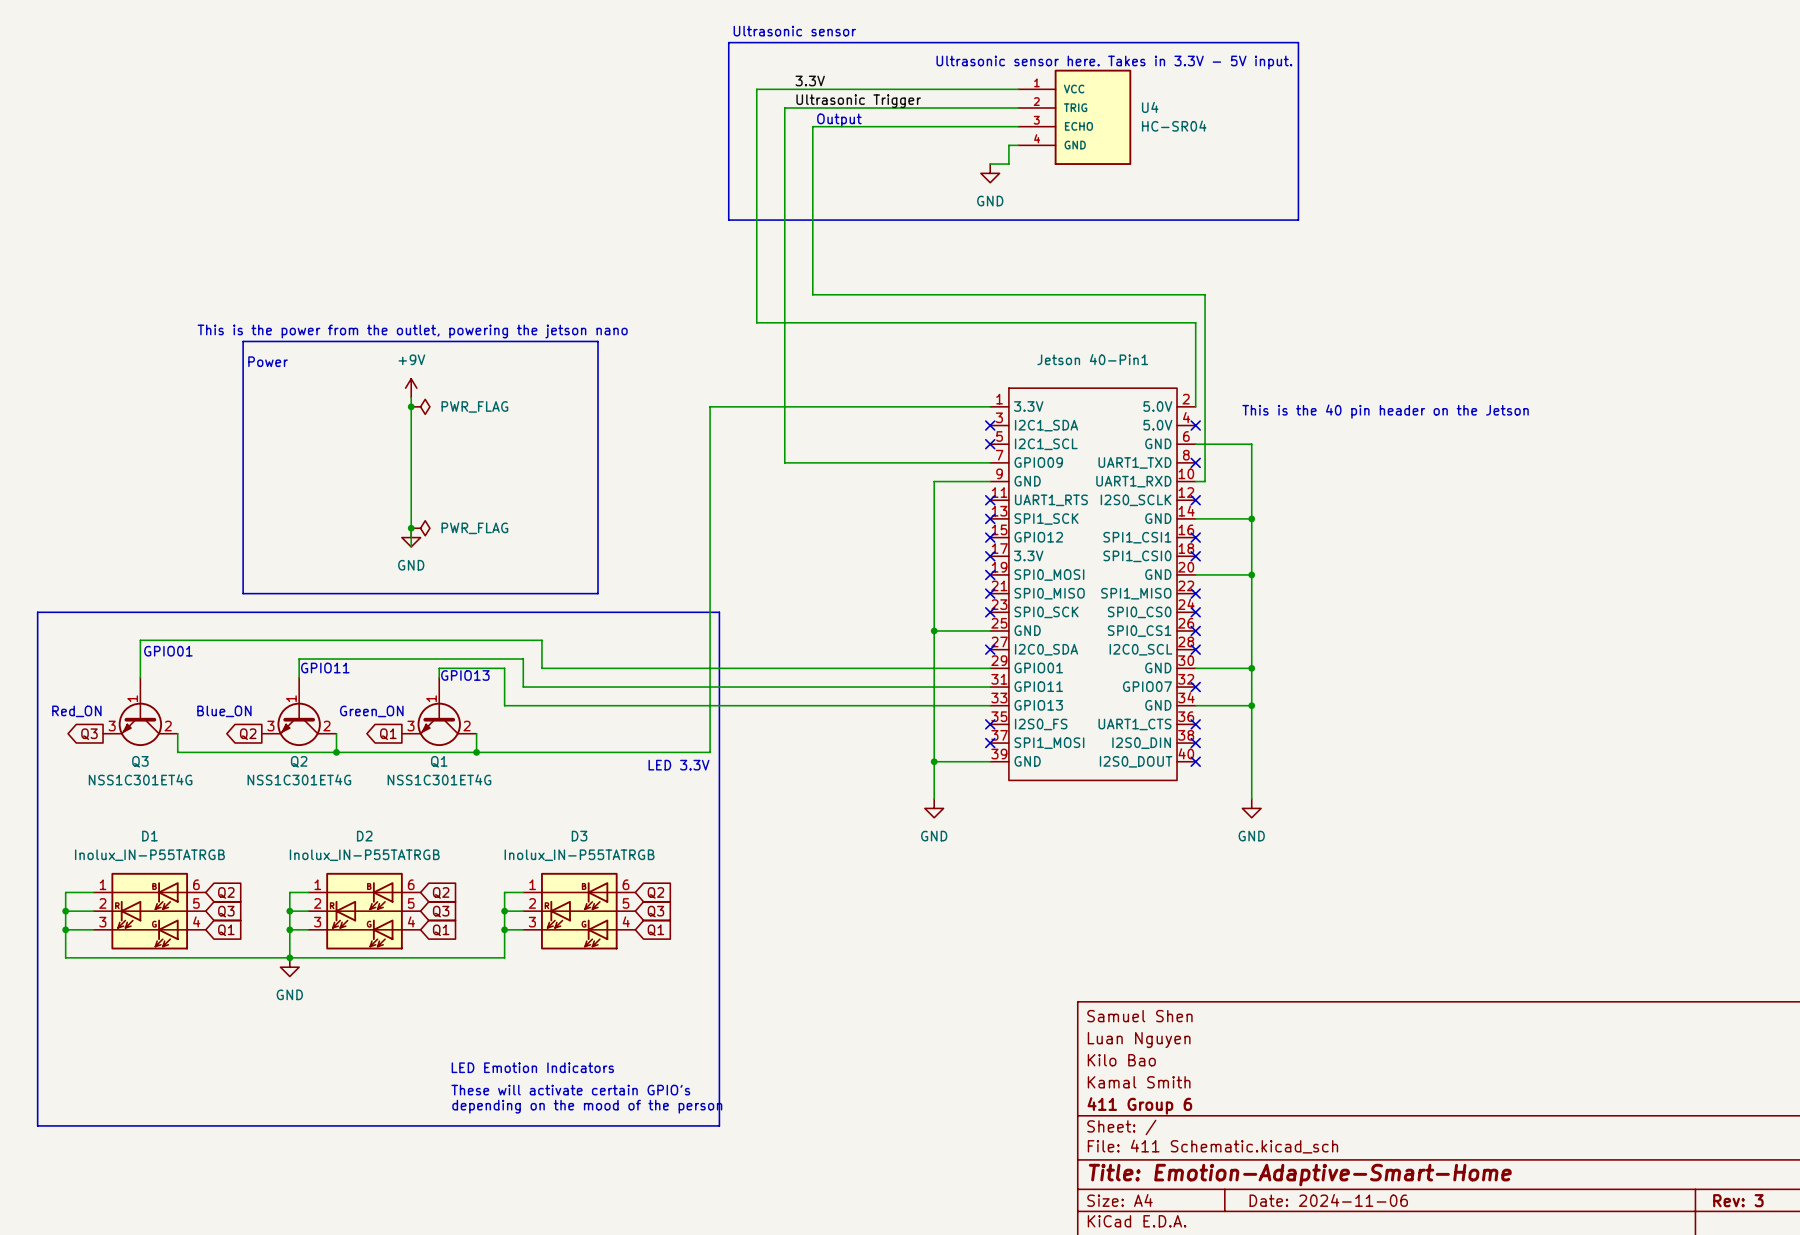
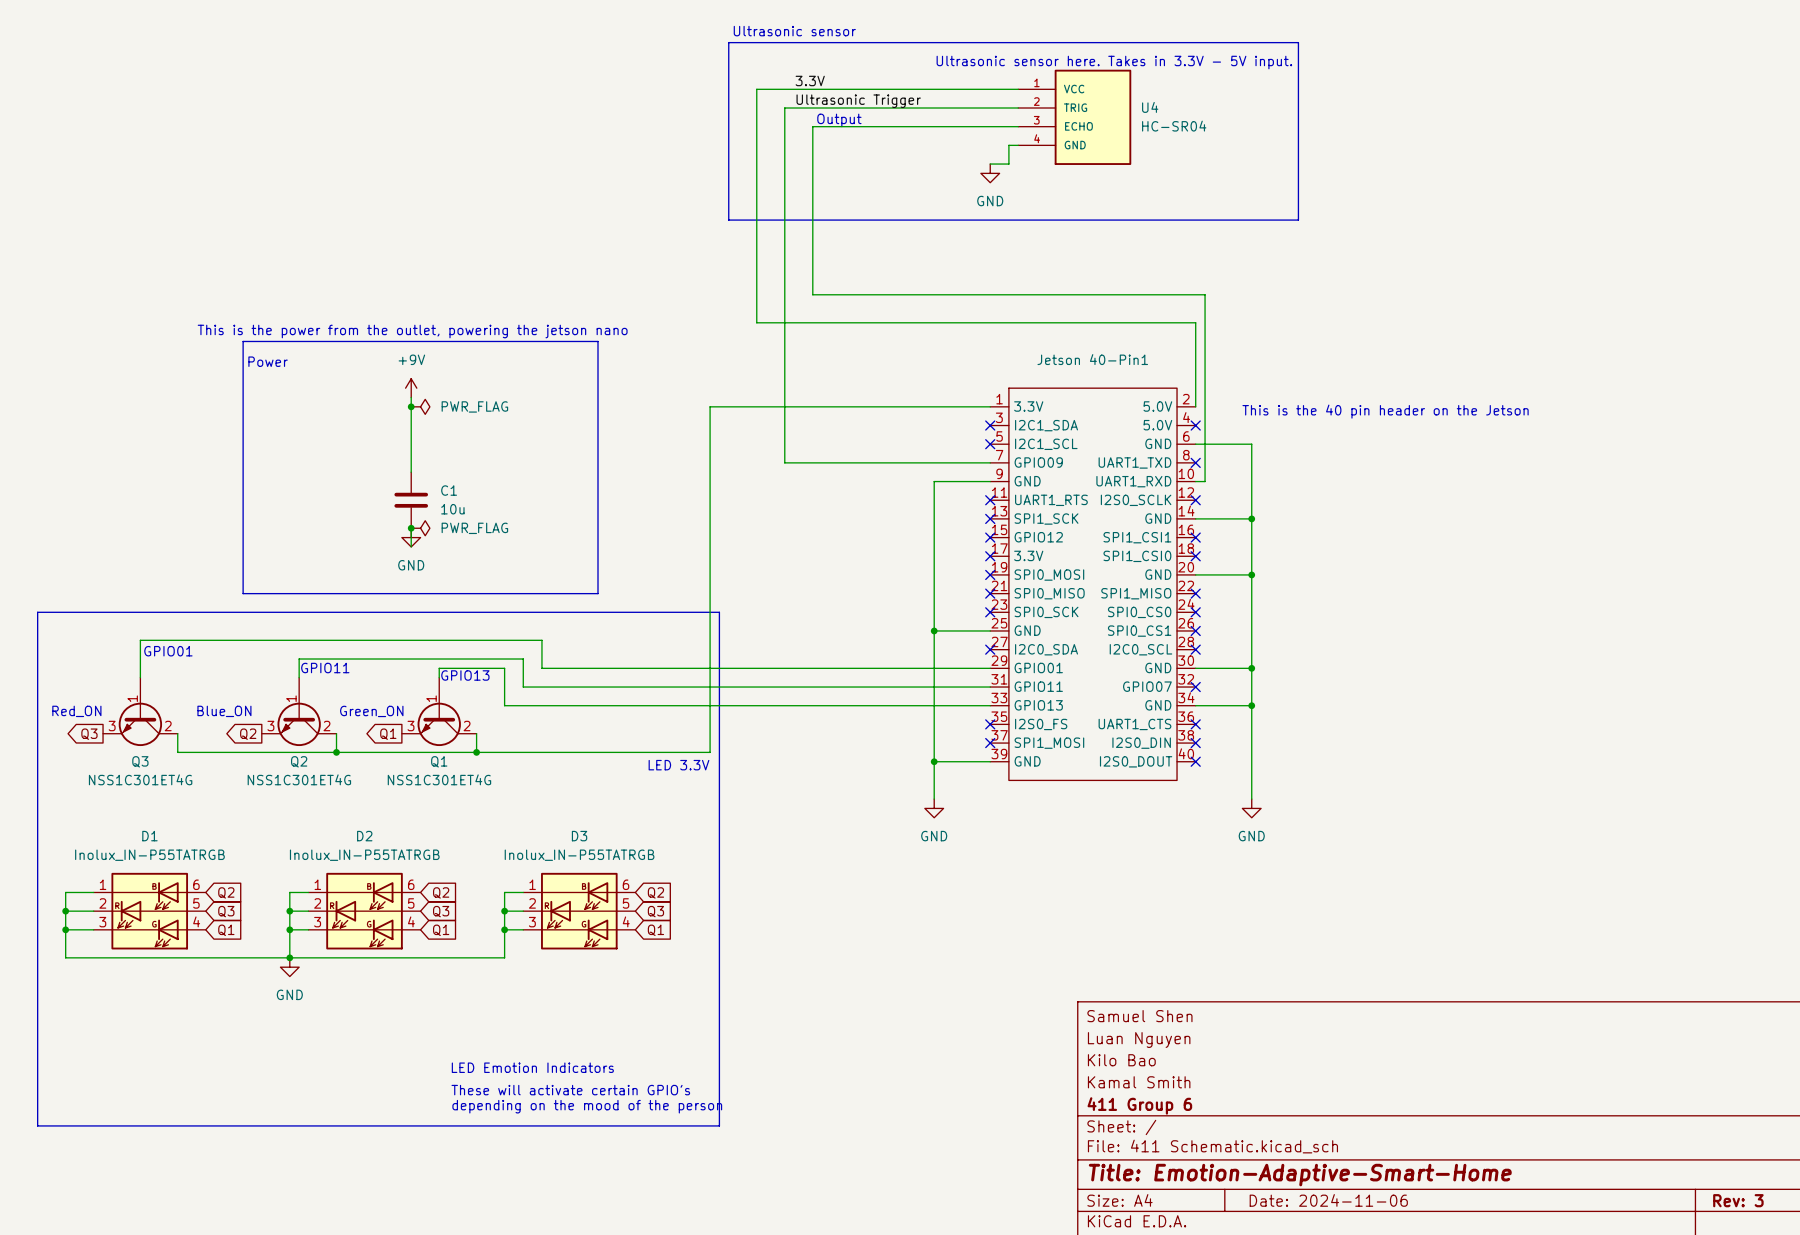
C1: none -> 10u (411, 500)

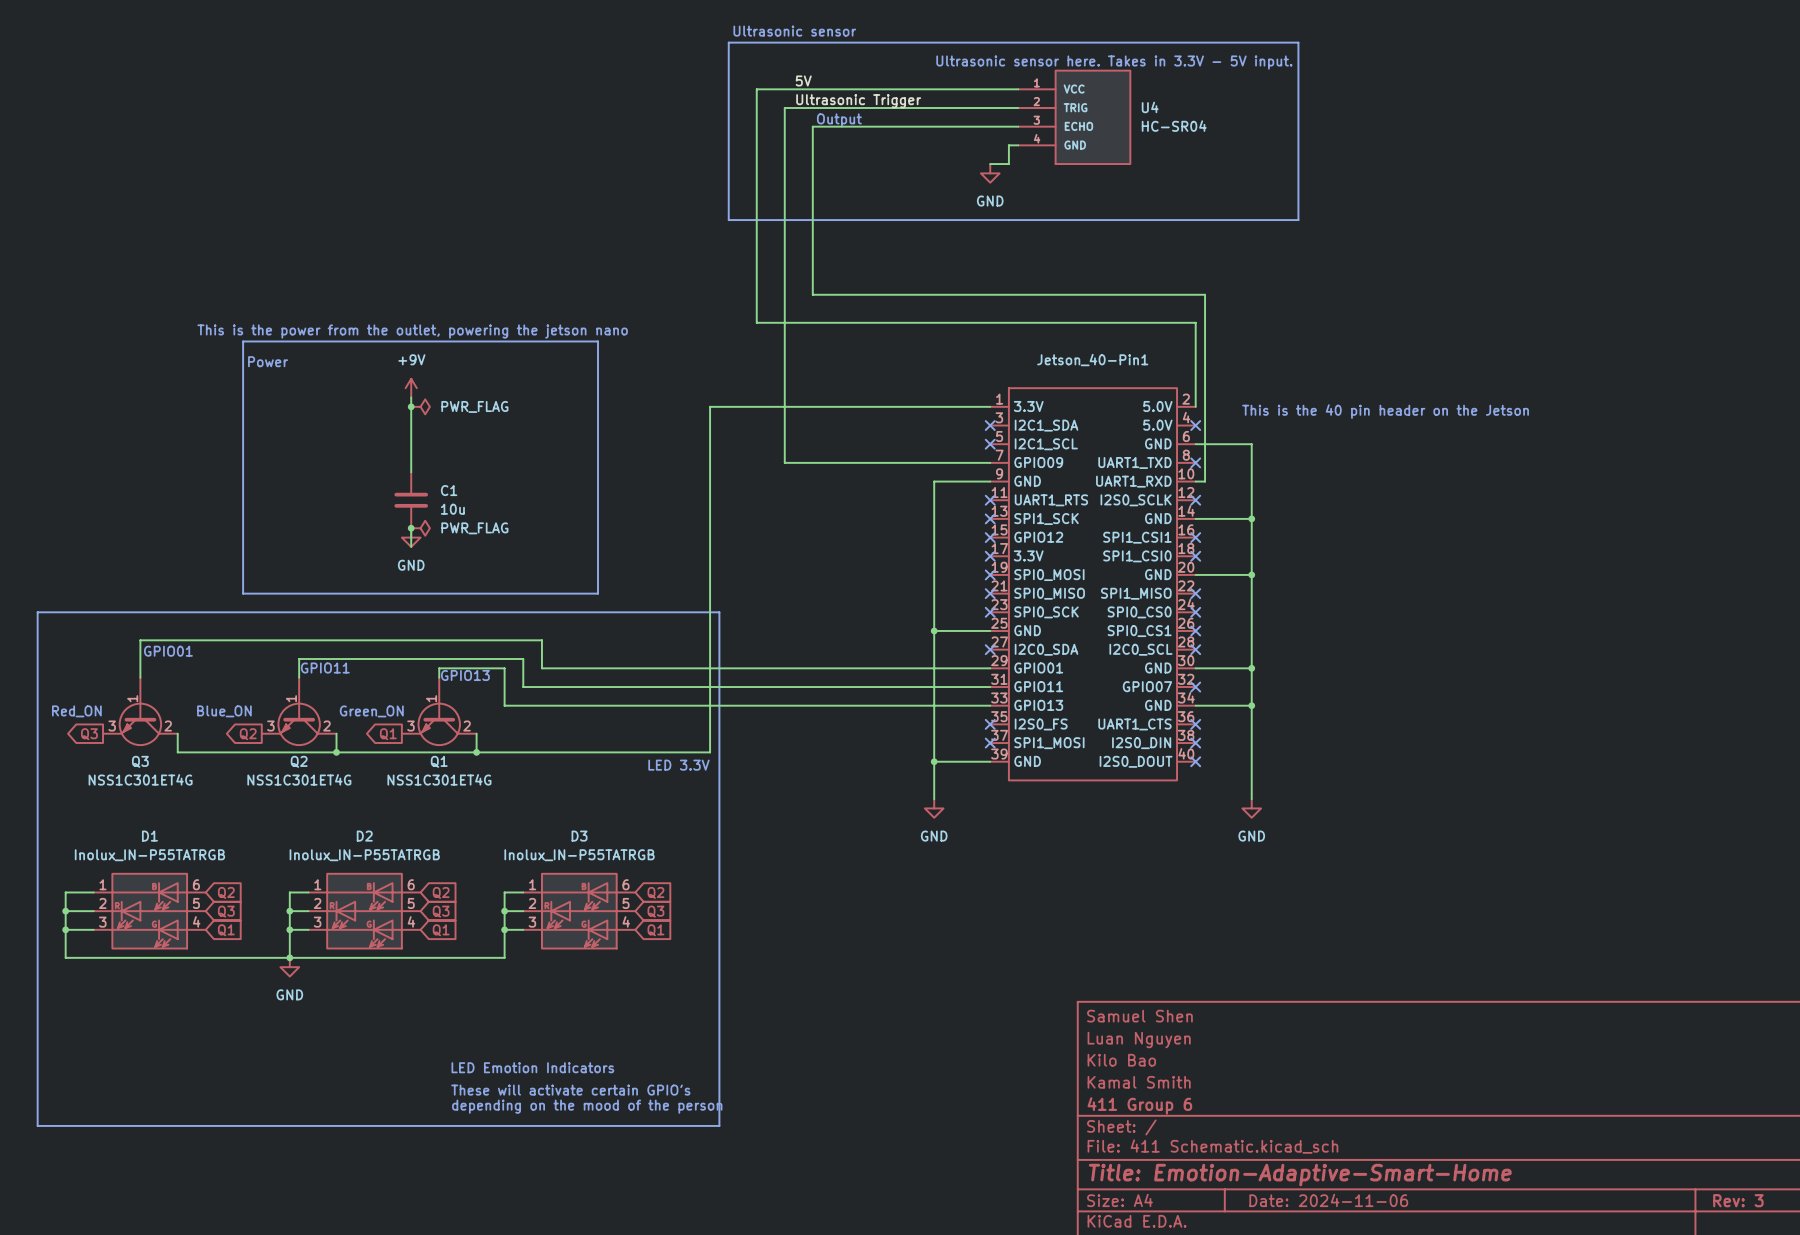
label: 3.3V (810, 80) -> 5V (803, 80)
Jetson 40-Pin1 name: Jetson 40-Pin1 (1092, 359) -> Jetson_40-Pin1 (1092, 360)

